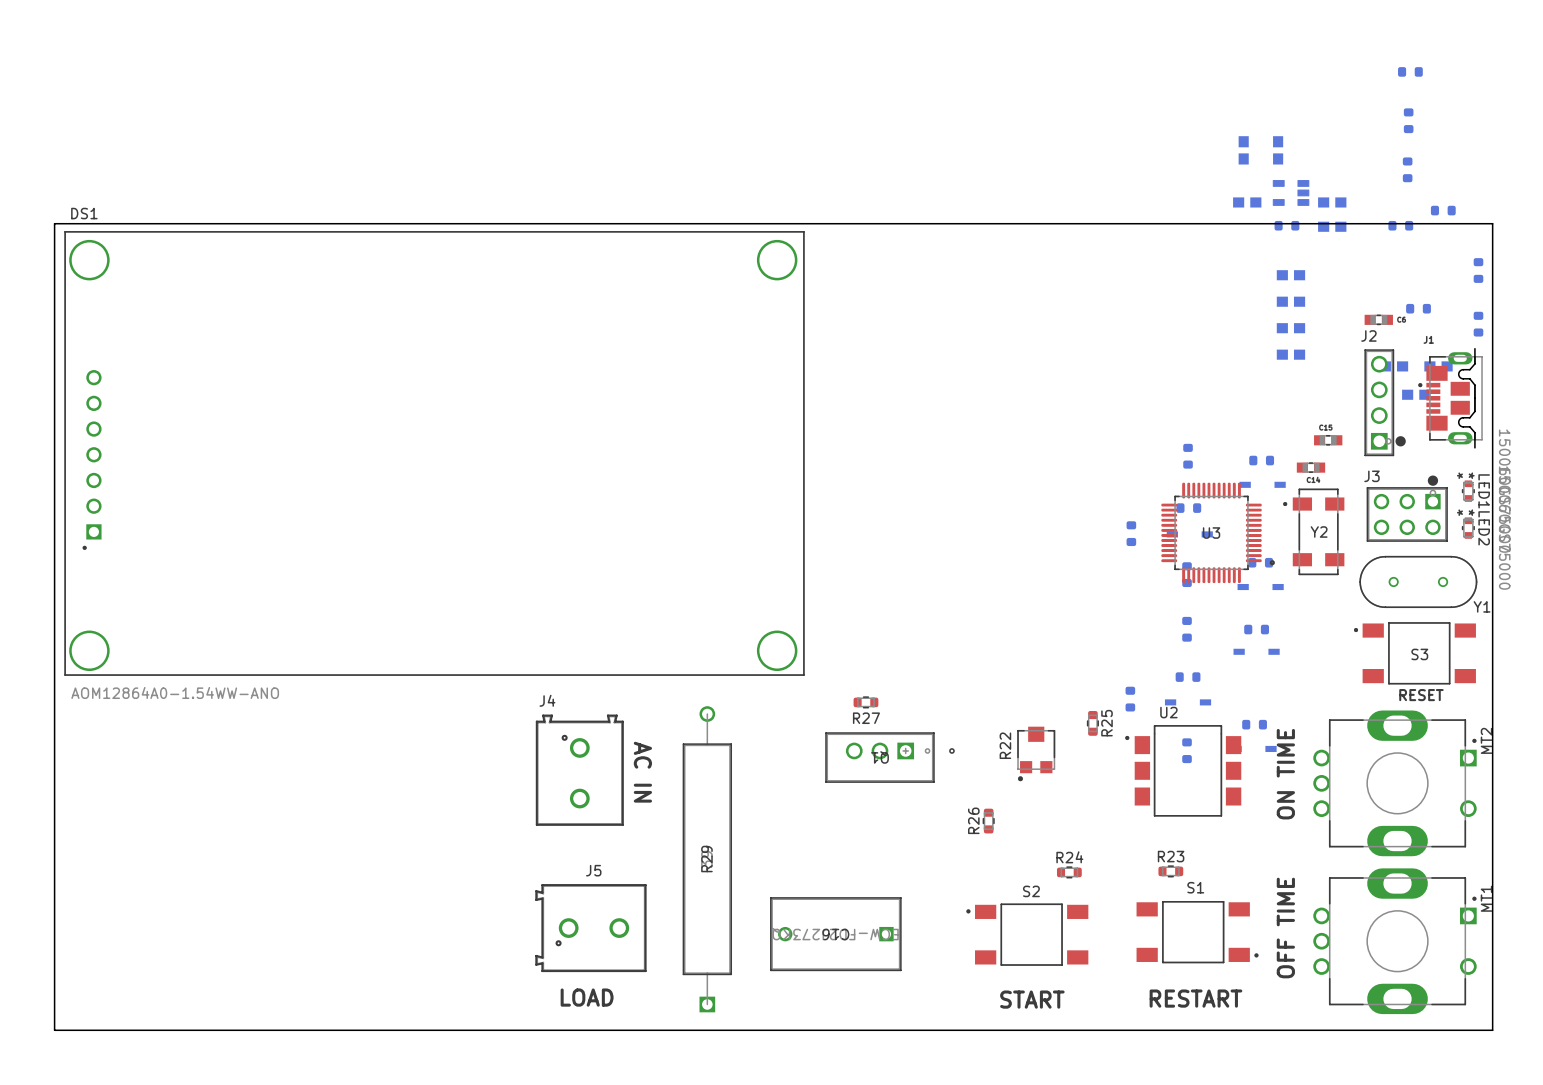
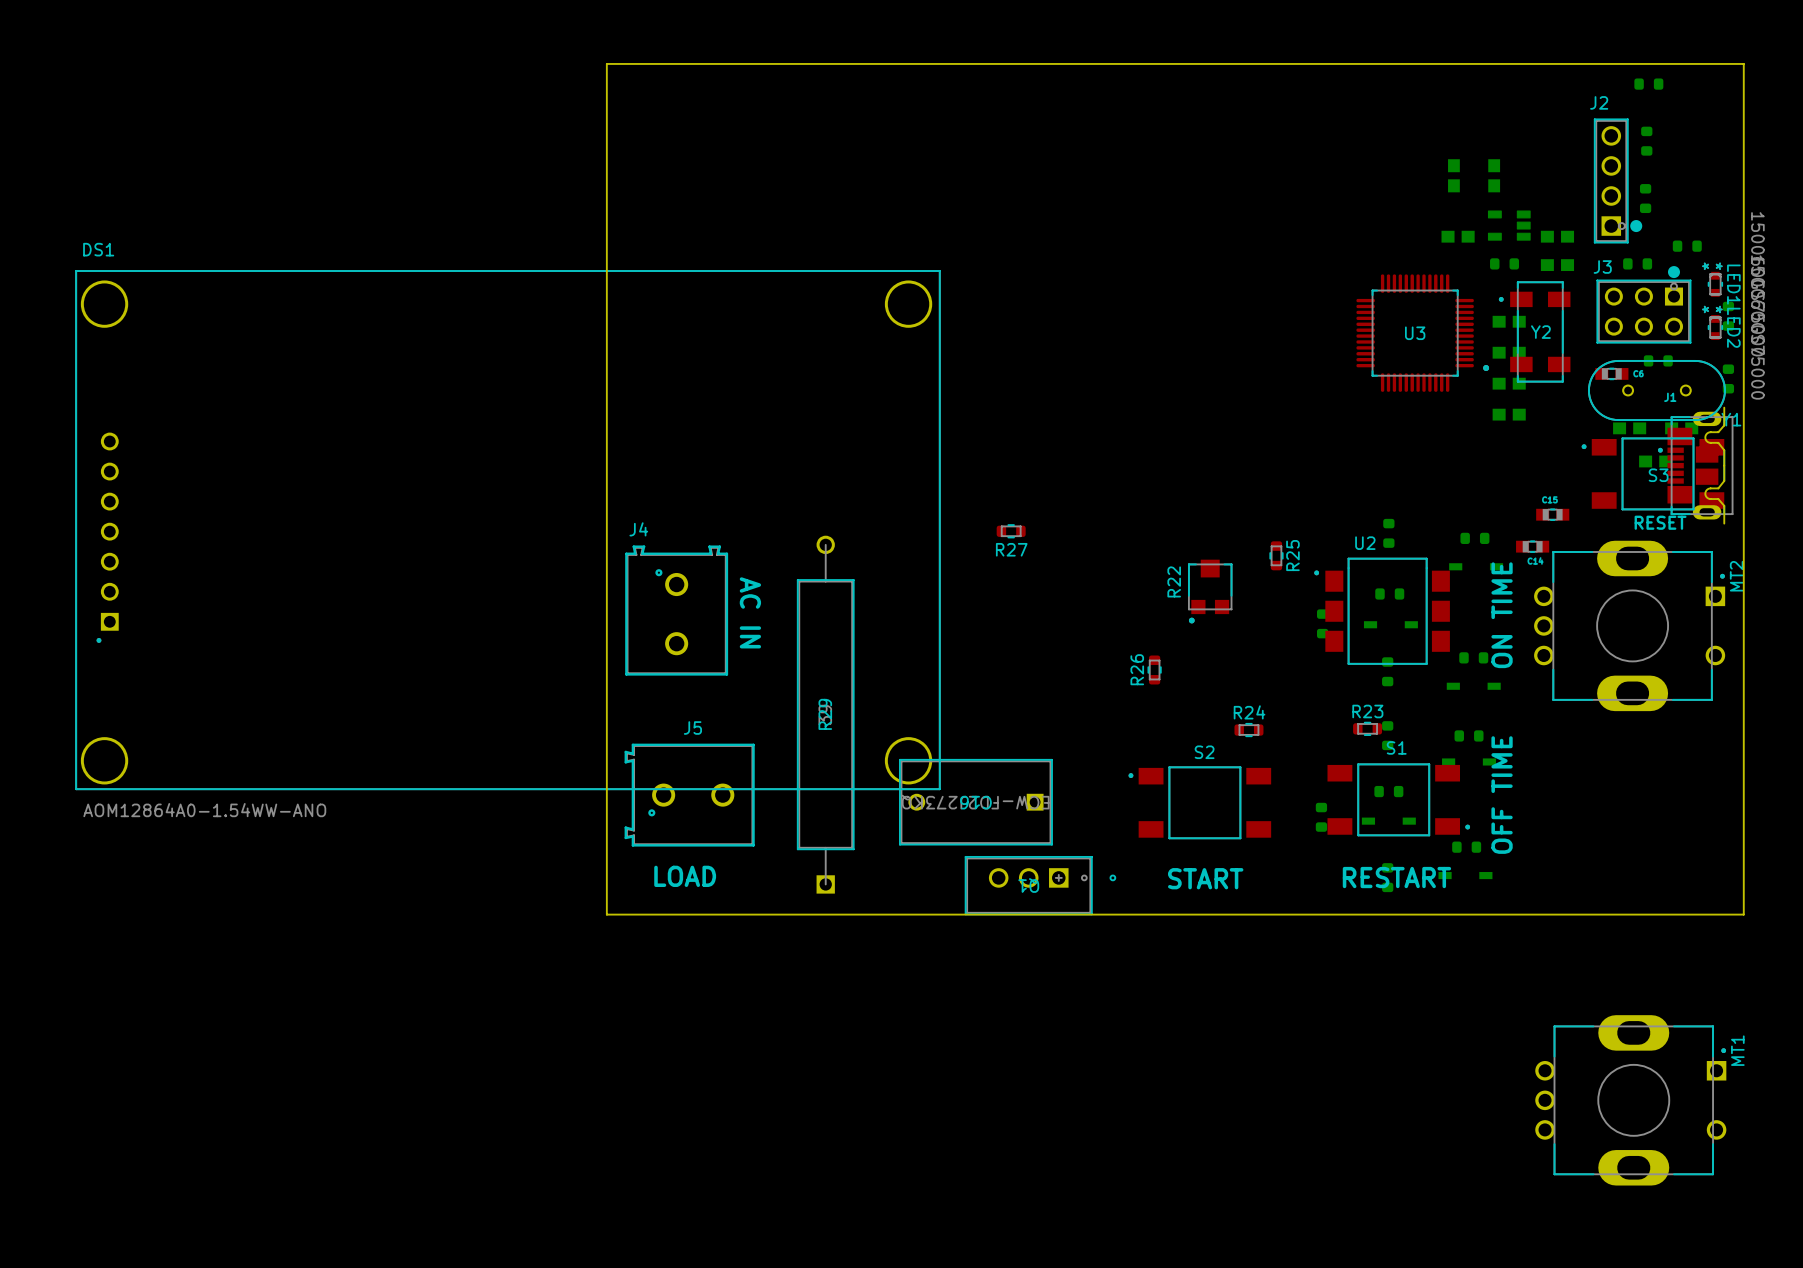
board edge: none -> (606, 63) (1743, 63) (1743, 914) (606, 914) (606, 63)
board edge: (54, 223) (1492, 223) (1492, 1030) (54, 1030) (54, 223) -> none
J2 position: (1385, 402) -> (1618, 180)
LED1 position: (1468, 491) -> (1715, 284)
J3 position: (1407, 508) -> (1643, 304)
LED2 position: (1468, 528) -> (1715, 327)
Y2 position: (1313, 531) -> (1534, 331)
U3 position: (1218, 532) -> (1422, 333)
Y1 position: (1418, 581) -> (1656, 390)
S3 position: (1414, 653) -> (1652, 473)
text position: RESET (1421, 695) -> RESET (1660, 522)
R27 position: (865, 702) -> (1011, 531)
R25 position: (1092, 723) -> (1276, 555)
R22 position: (1036, 753) -> (1210, 591)
J4 position: (579, 770) -> (676, 610)
U2 position: (1183, 770) -> (1382, 611)
text position: AC IN (642, 772) -> AC IN (750, 612)
text position: ON TIME (1285, 774) -> ON TIME (1502, 615)
MT2 position: (1394, 783) -> (1629, 625)
R26 position: (988, 821) -> (1154, 670)
R29 position: (707, 859) -> (825, 714)
R23 position: (1170, 871) -> (1367, 728)
R24 position: (1069, 872) -> (1248, 730)
J5 position: (590, 928) -> (689, 795)
text position: OFF TIME (1285, 928) -> OFF TIME (1502, 795)
S1 position: (1197, 932) -> (1398, 799)
C16 position: (835, 934) -> (975, 802)
S2 position: (1027, 934) -> (1199, 802)
text position: LOAD (587, 997) -> LOAD (685, 876)
text position: RESTART (1195, 998) -> RESTART (1396, 877)
text position: START (1032, 999) -> START (1205, 878)

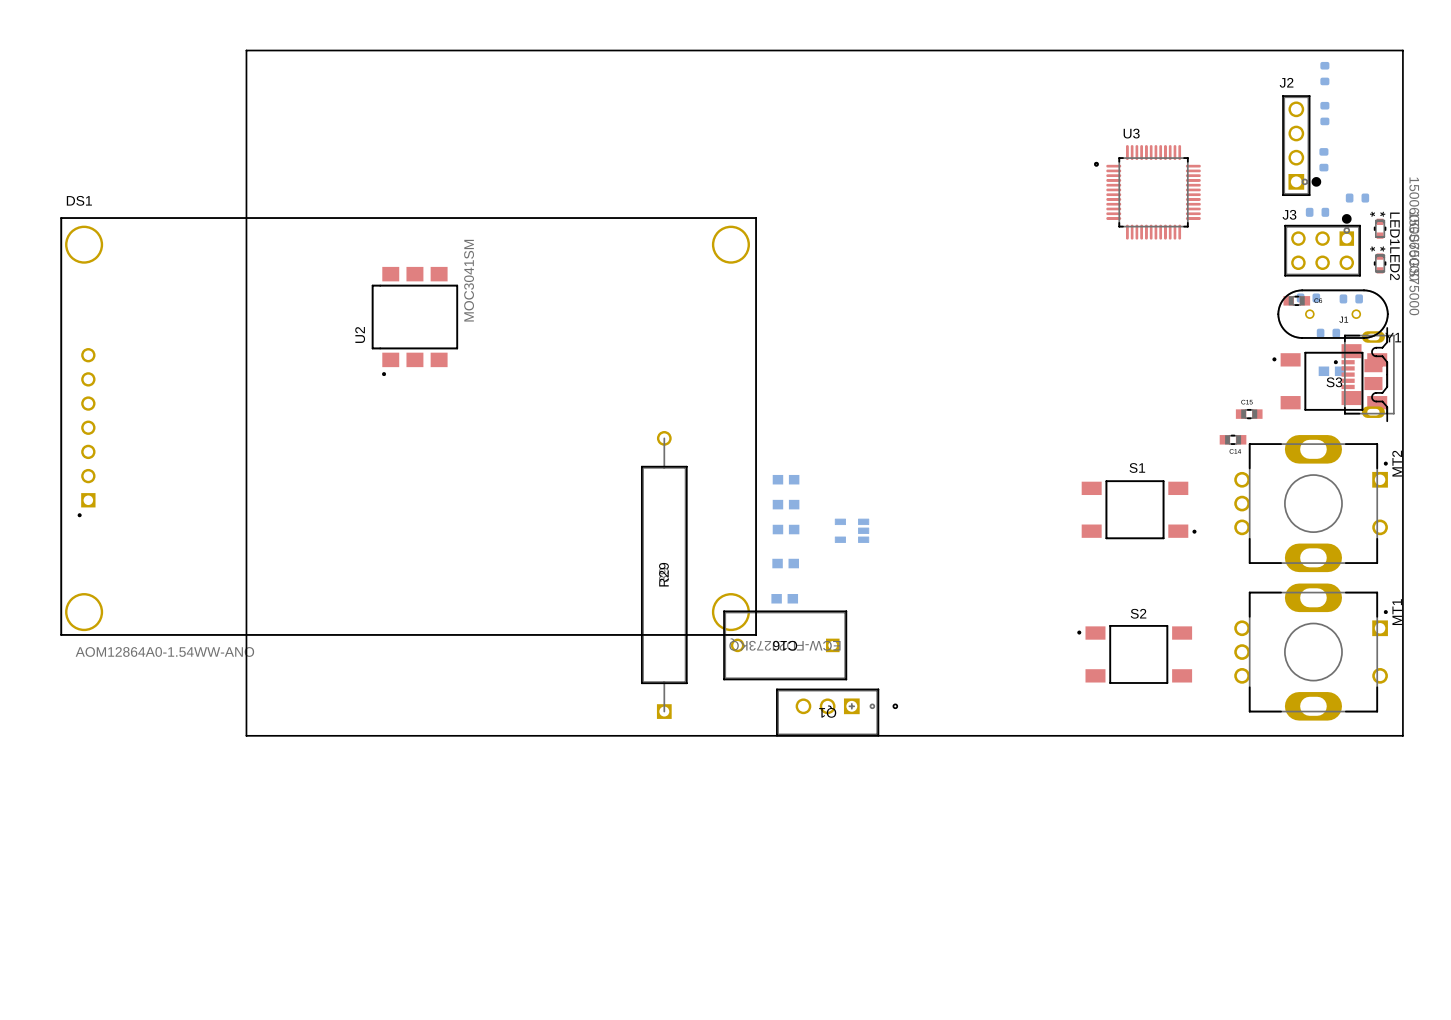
board edge: (1743, 63) (606, 63) (606, 914) -> (1402, 51) (246, 50) (246, 735) (488, 735)
part rotation: 0° (1648, 84) -> 90° clockwise (1324, 73)
part: (1453, 175) -> none
part: (1494, 175) -> none
part: (1509, 225) -> none
part: (1458, 236) -> none
part: (1557, 236) -> none
part: (1504, 263) -> none
part: (1557, 265) -> none
part: (1728, 316) -> none
part: (1509, 321) -> none
Y2: (1534, 331) -> none
U3 name position: U3 (1415, 333) -> U3 (1131, 133)
U3 rotation: 0° (1422, 333) -> 180° (1147, 192)
U3 position: (1422, 333) -> (1147, 192)
U2 value: none -> MOC3041SM (469, 280)
part: (1509, 352) -> none
part: (1658, 360) -> none
part: none -> (1308, 297)
part: none -> (1351, 298)
part: (1728, 378) -> none
part: (1509, 383) -> none
part: (1509, 414) -> none
part: none -> (1328, 333)
part: (1629, 428) -> none
part: (1681, 428) -> none
text: RESET (1660, 522) -> none
R27: (1011, 531) -> none
part: (1388, 533) -> none
part: (1474, 538) -> none
R25: (1276, 555) -> none
part: (1476, 566) -> none
R22: (1210, 591) -> none
part: (1389, 593) -> none
part: none -> (786, 479)
J4: (676, 610) -> none
U2 rotation: 0° (1382, 611) -> 90° counterclockwise (414, 321)
U2 position: (1382, 611) -> (414, 321)
text: AC IN (750, 612) -> none
text: ON TIME (1502, 615) -> none
part: (1322, 623) -> none
part: (1390, 624) -> none
part: none -> (786, 504)
part: (1473, 657) -> none
part: none -> (786, 529)
part: none -> (852, 530)
R26: (1154, 670) -> none
part: (1387, 671) -> none
part: (1473, 686) -> none
part: none -> (785, 563)
R23: (1367, 728) -> none
R24: (1248, 730) -> none
part: (1387, 735) -> none
part: (1469, 735) -> none
part: none -> (784, 598)
part: (1469, 761) -> none
part: (1388, 791) -> none
J5: (689, 795) -> none
text: OFF TIME (1502, 795) -> none
S1 position: (1398, 799) -> (1139, 509)
S2 position: (1199, 802) -> (1134, 654)
part: (1321, 817) -> none
part: (1388, 821) -> none
part: (1466, 847) -> none
part: (1465, 875) -> none
text: LOAD (685, 876) -> none
part: (1387, 877) -> none
text: RESTART (1396, 877) -> none
text: START (1205, 878) -> none
MT1 position: (1630, 1100) -> (1311, 652)

